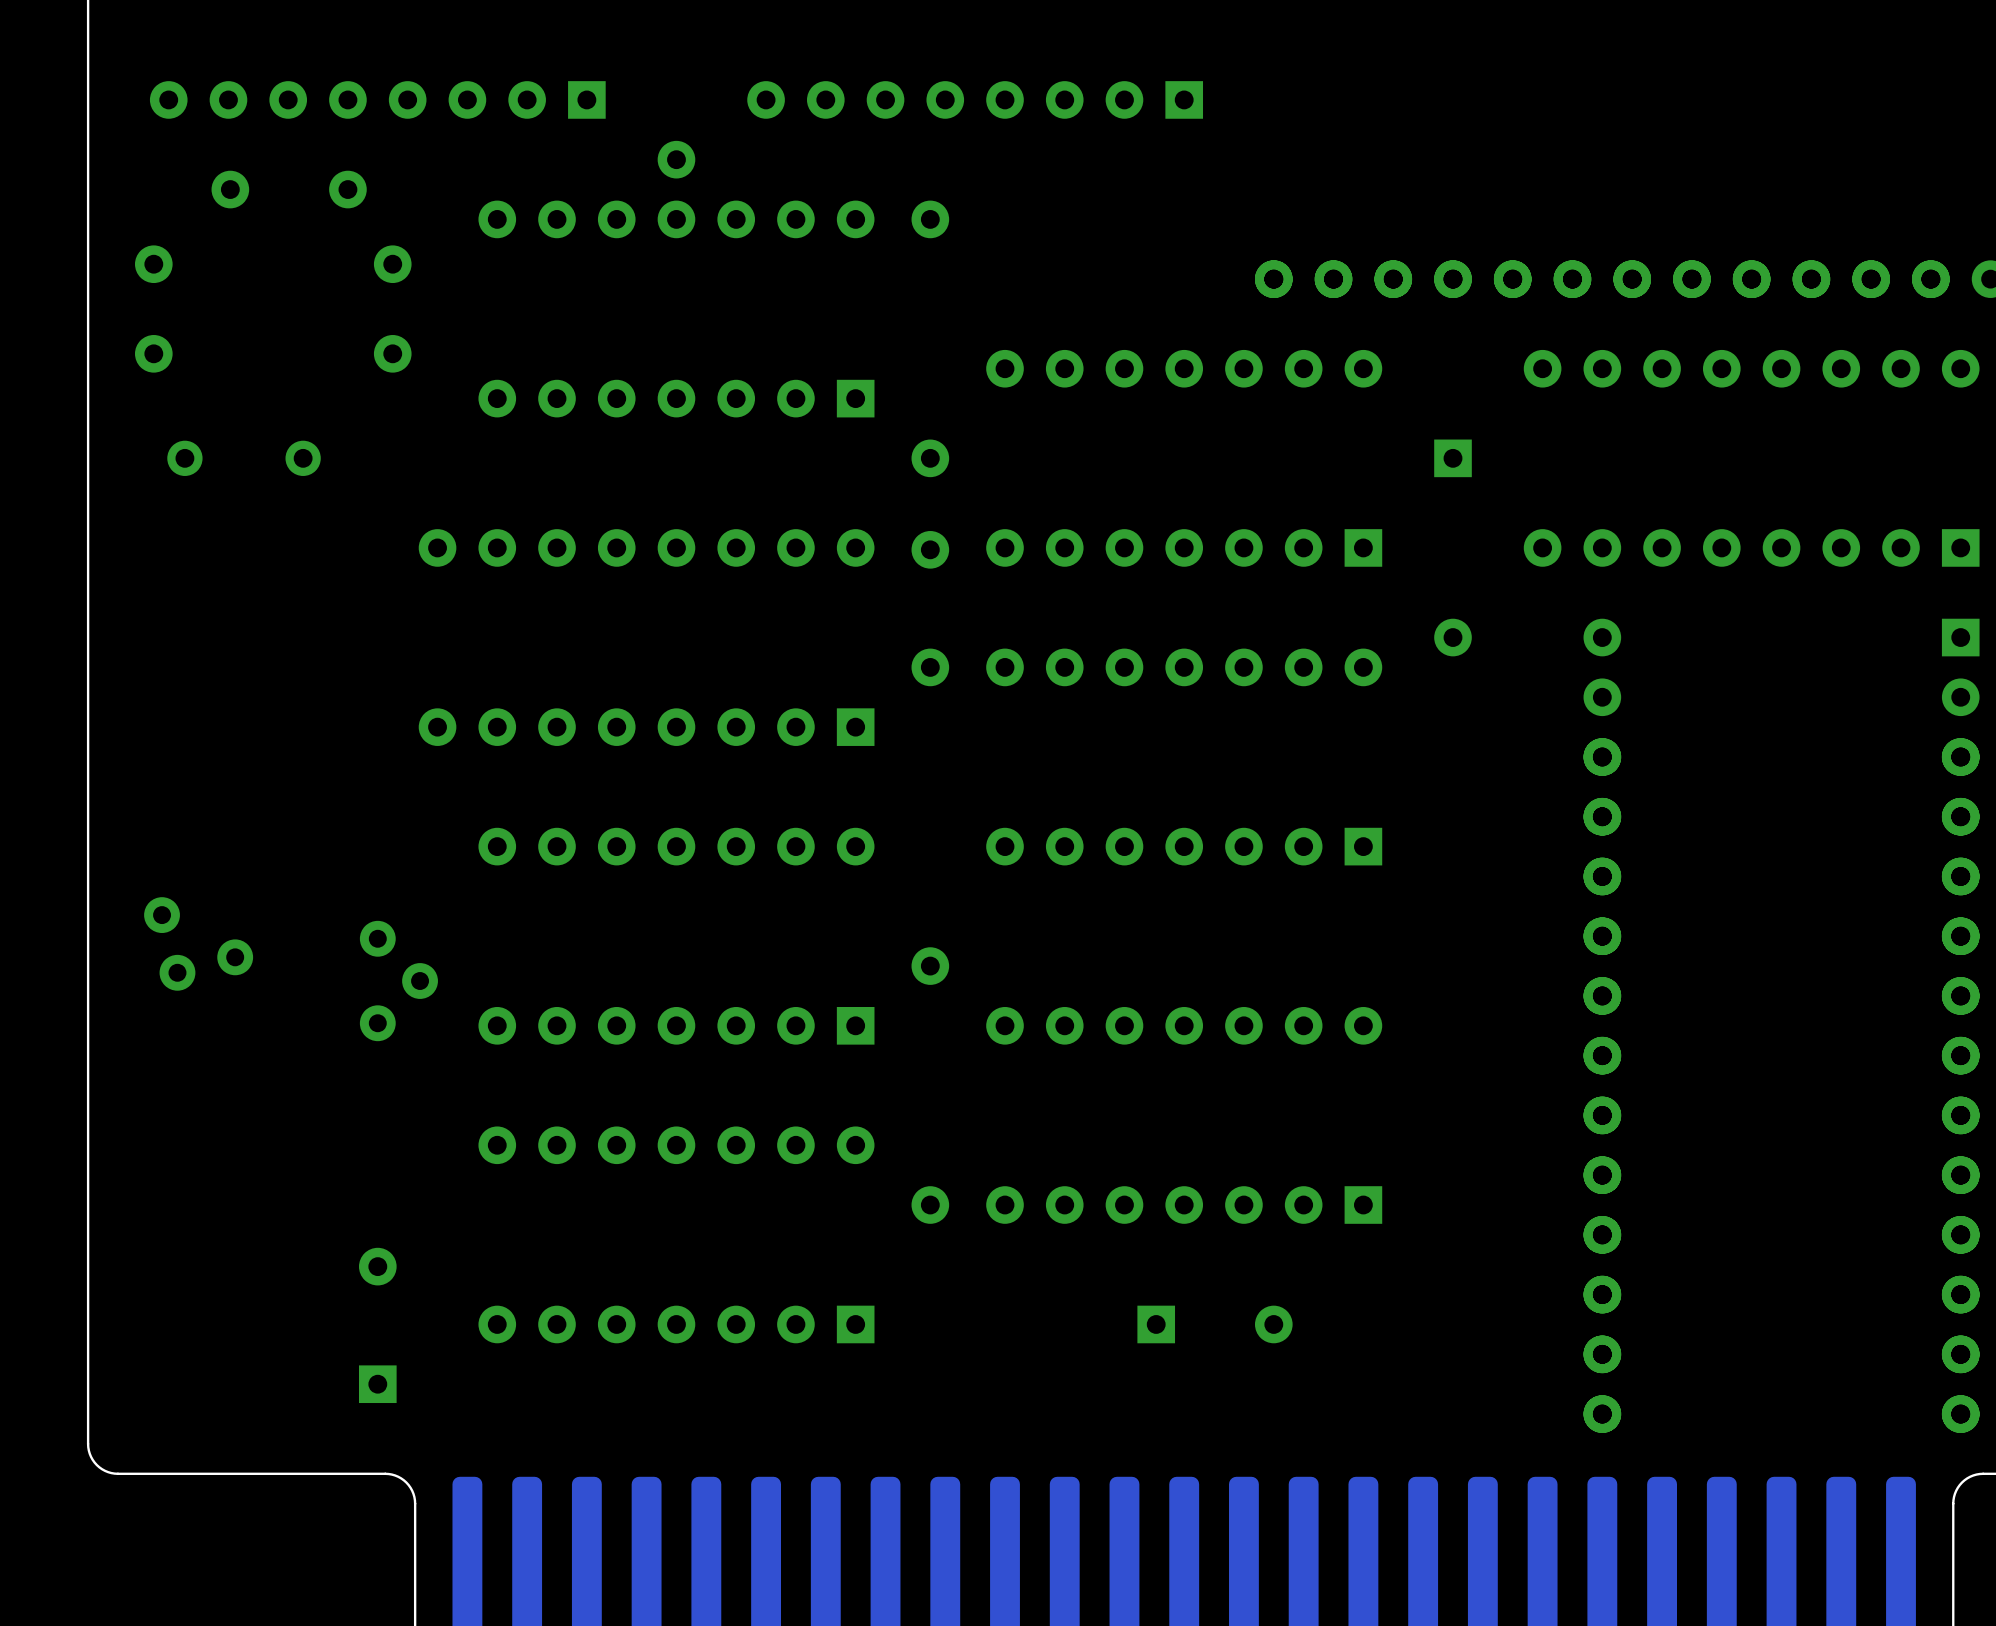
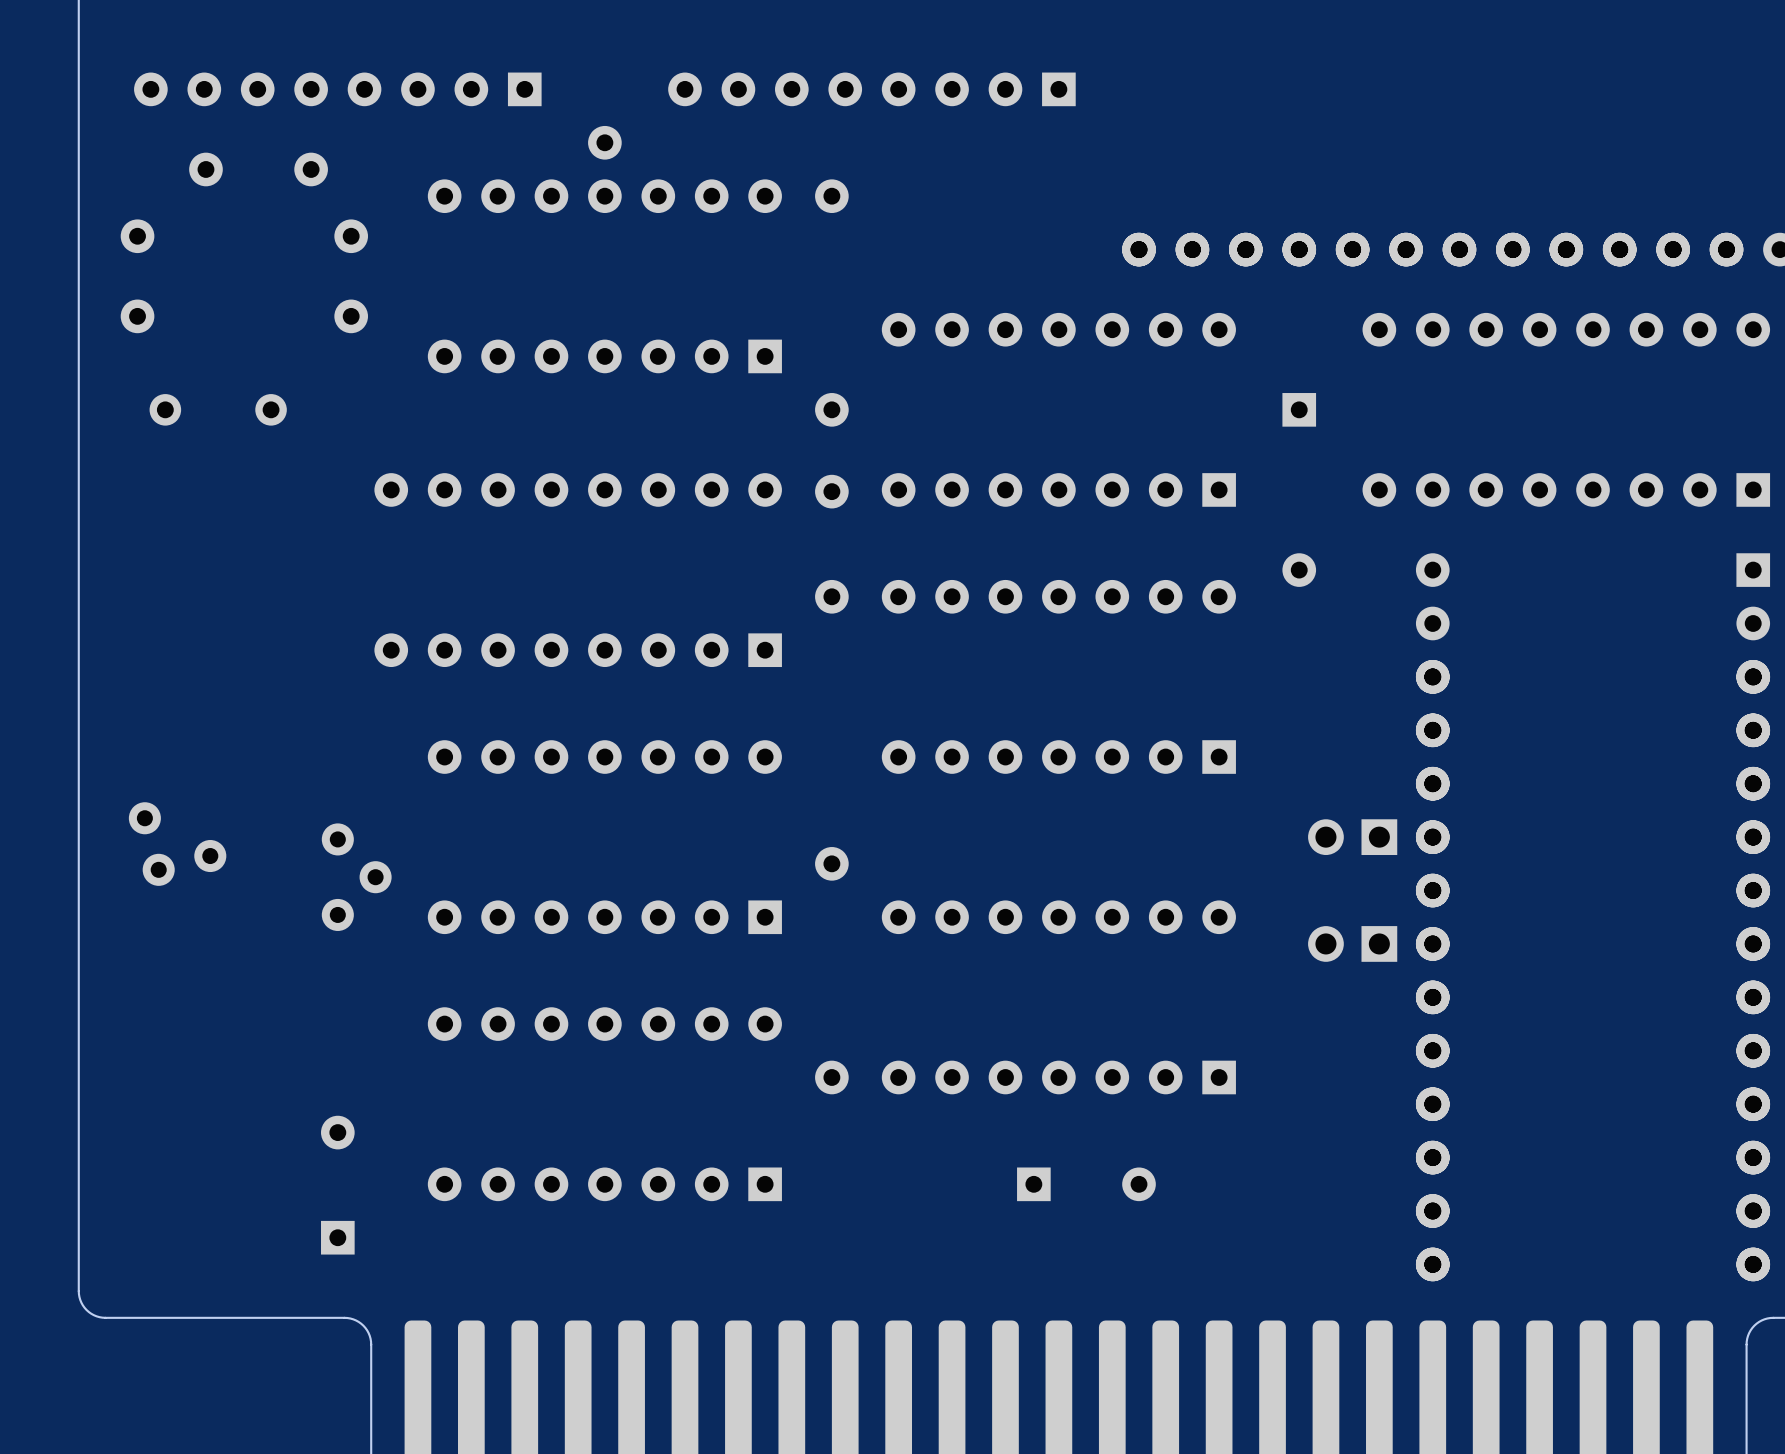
part: none -> (1352, 837)
part: none -> (1352, 943)

